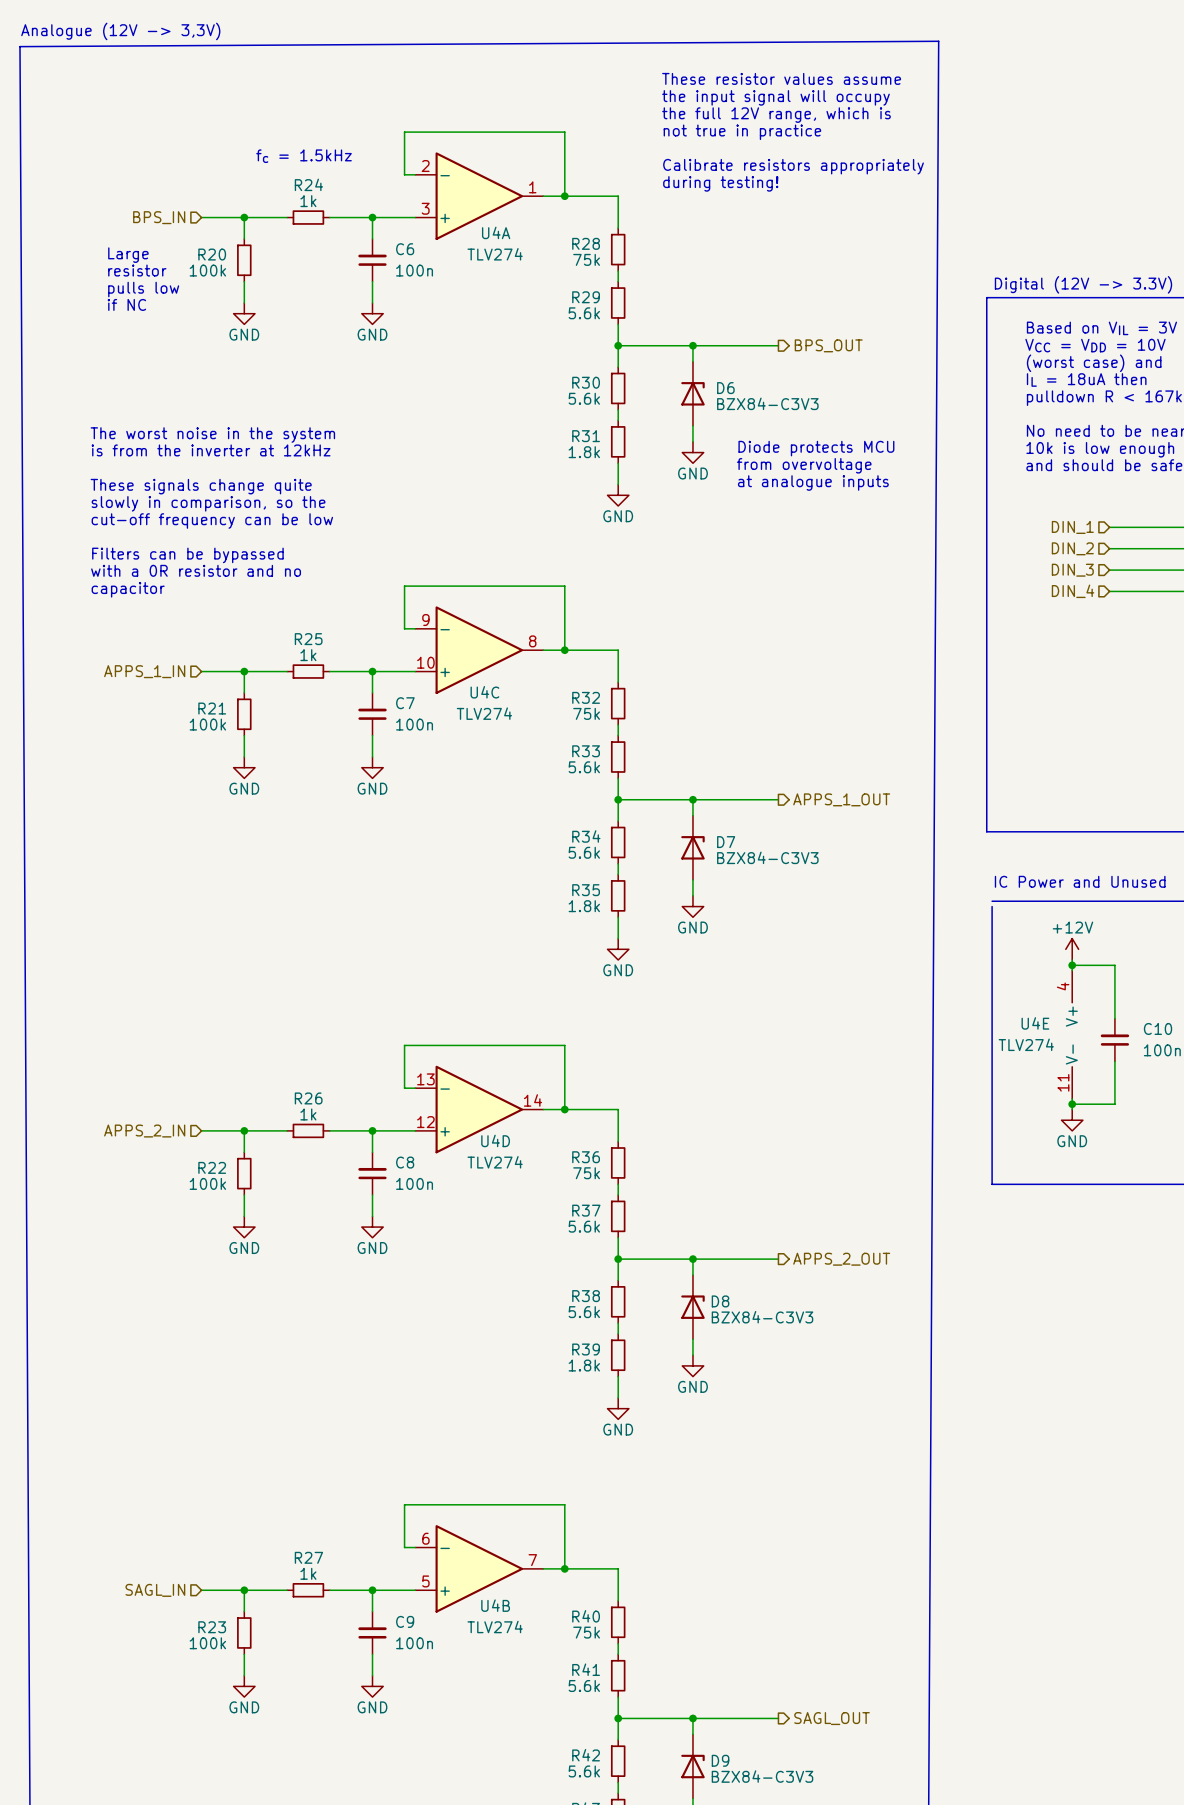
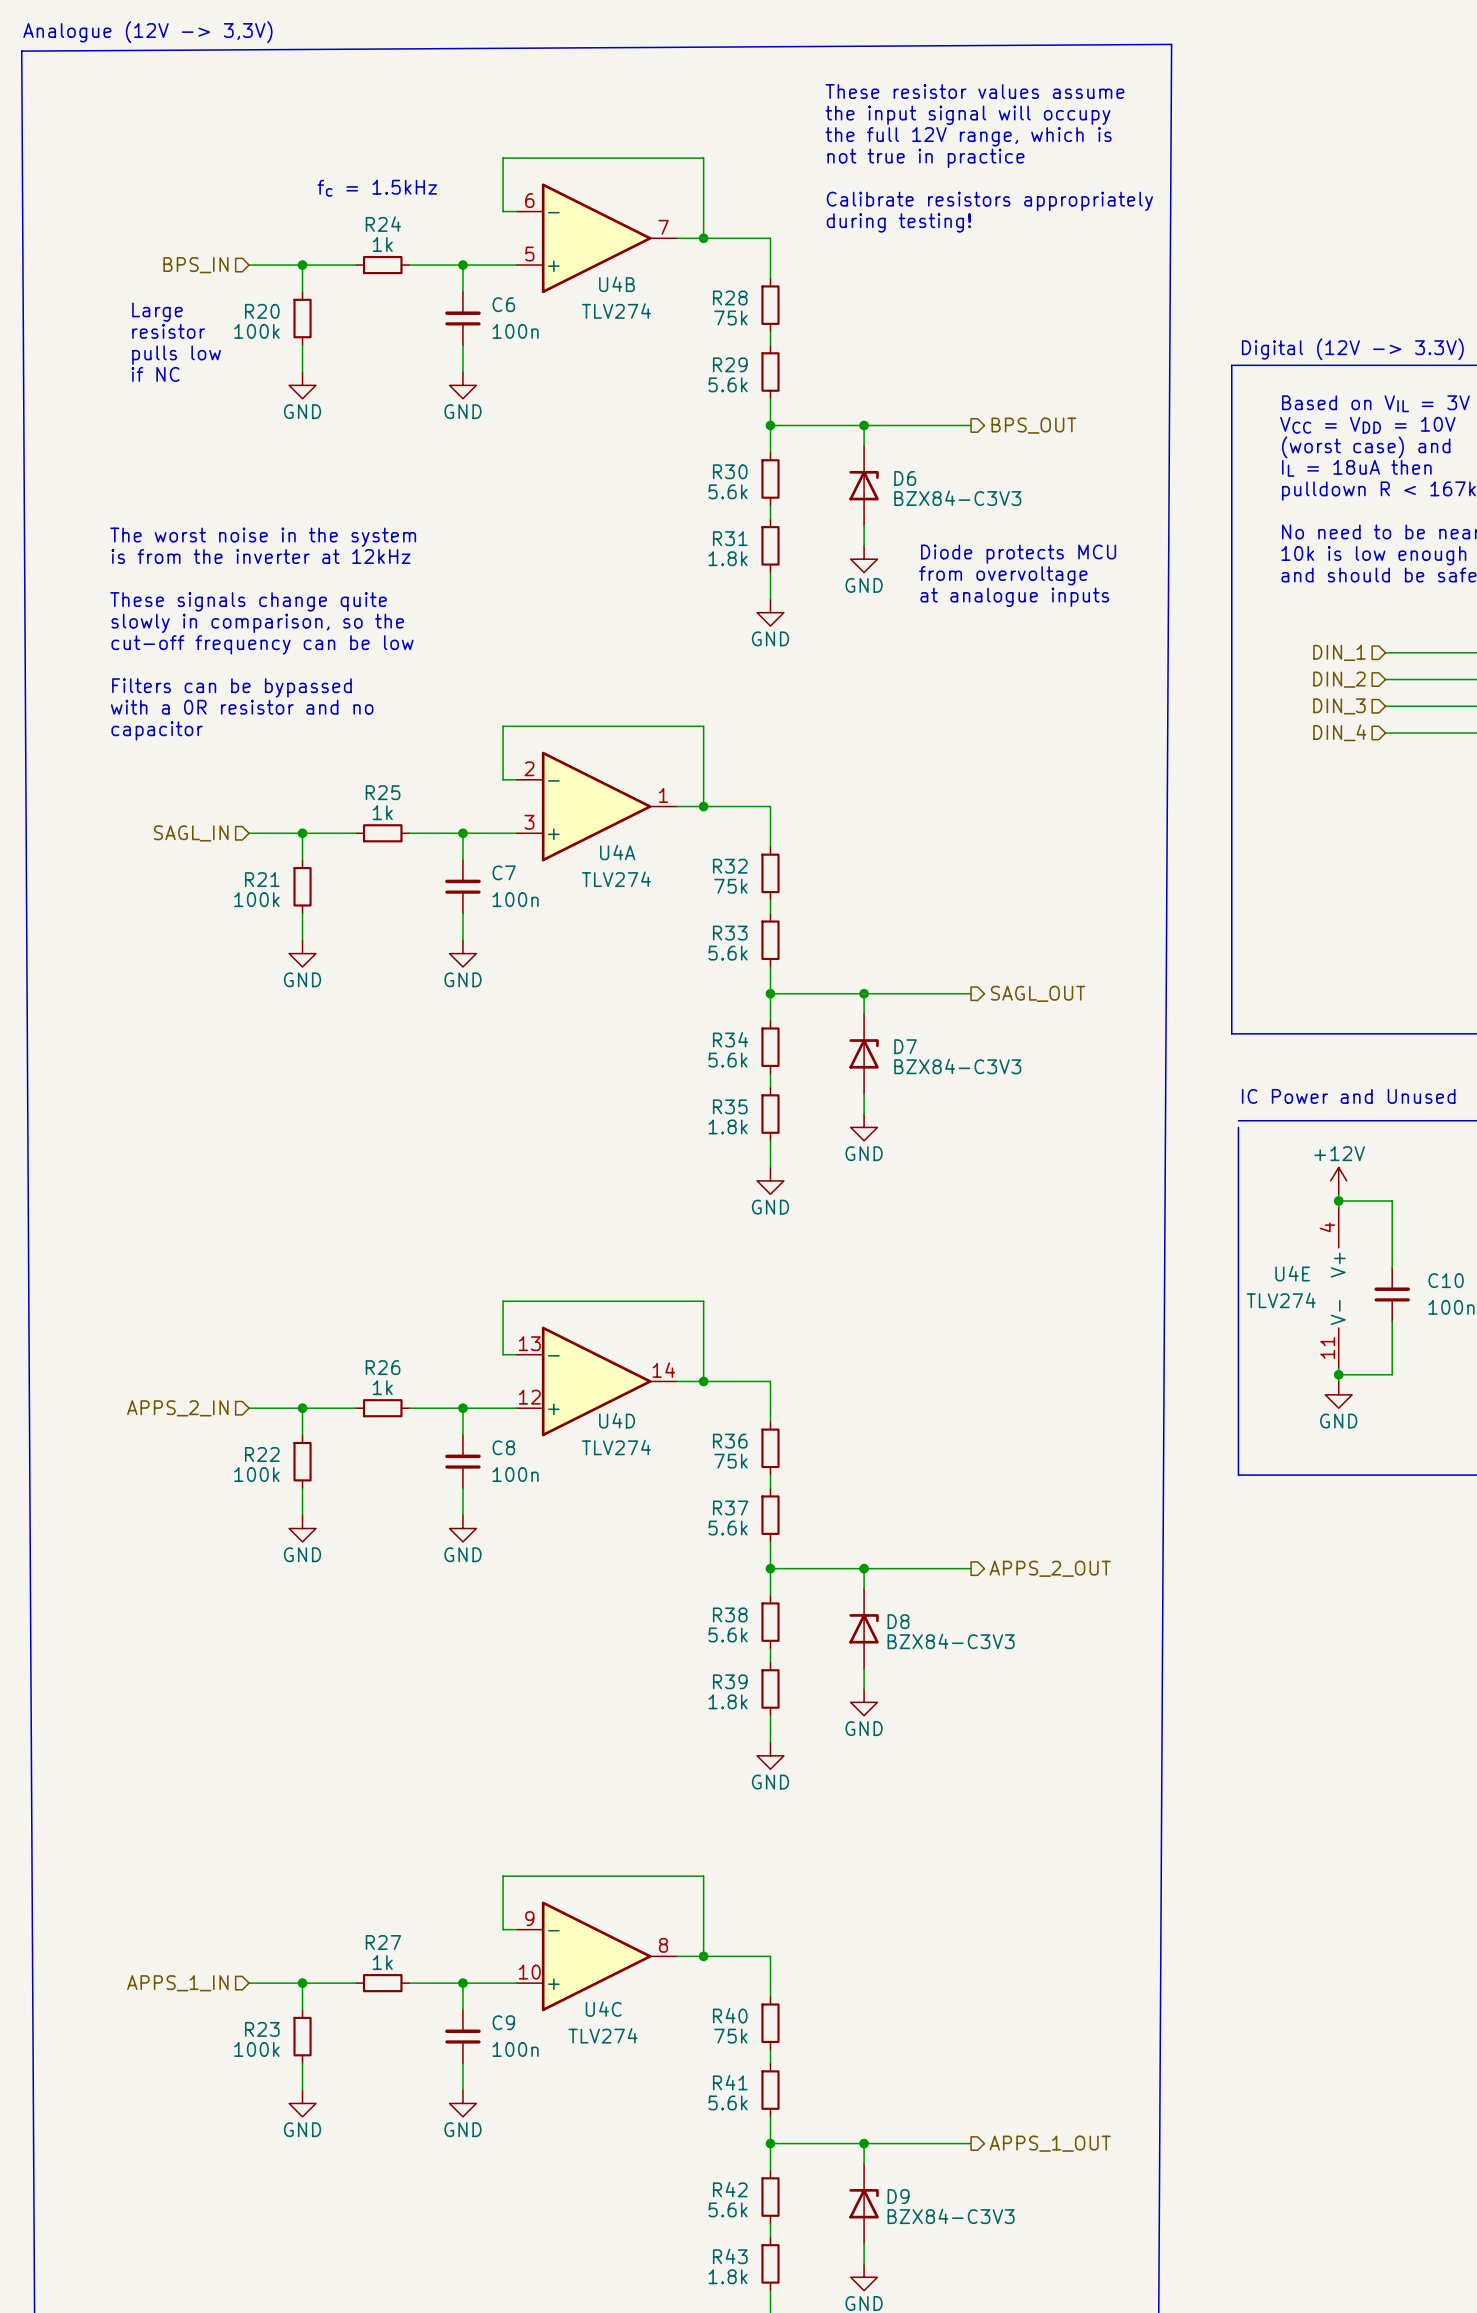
U4A position: (479, 196) -> (596, 806)
U4C position: (479, 650) -> (596, 1956)
hierarchical label: APPS_1_IN (144, 671) -> SAGL_IN (191, 833)
hierarchical label: APPS_1_OUT (841, 799) -> SAGL_OUT (1038, 993)
U4B position: (479, 1568) -> (596, 238)
hierarchical label: SAGL_IN (155, 1590) -> APPS_1_IN (177, 1983)
hierarchical label: SAGL_OUT (832, 1718) -> APPS_1_OUT (1050, 2143)

